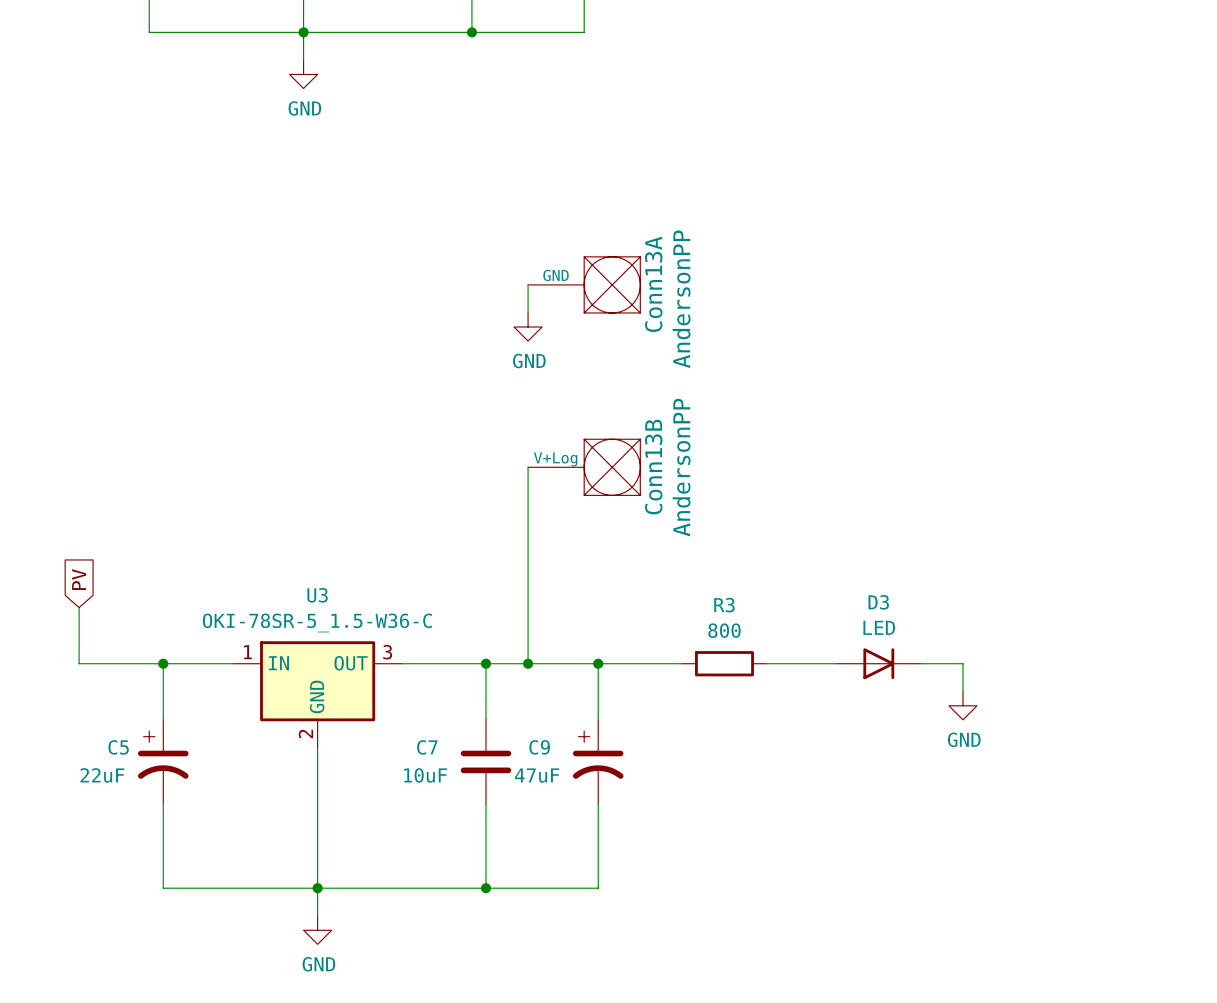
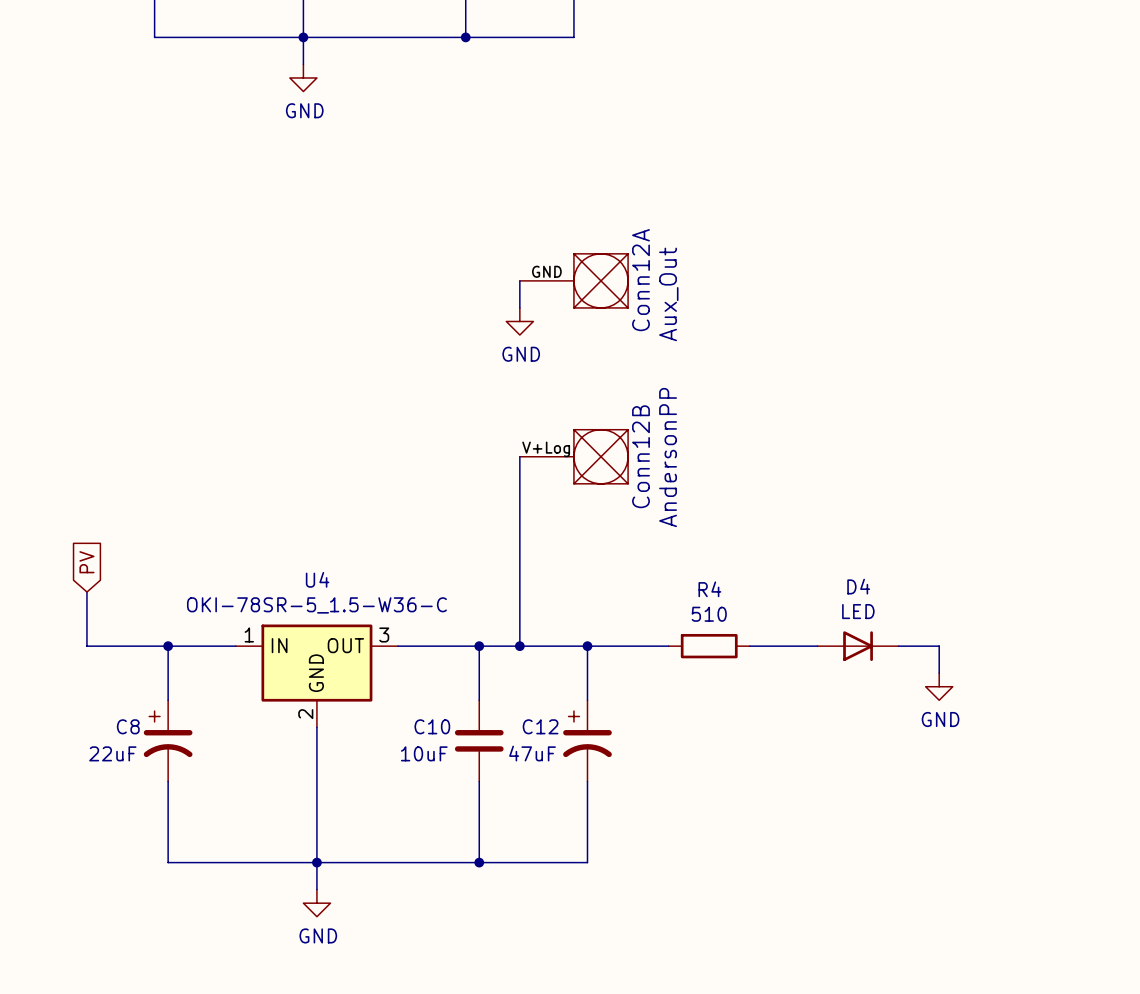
Conn13A name: Conn13A (653, 284) -> Conn12A (640, 280)
Conn13A value: AndersonPP (681, 299) -> Aux_Out (668, 294)
Conn13B name: Conn13B (653, 467) -> Conn12B (640, 456)
U3 name: U3 (317, 595) -> U4 (317, 579)
D3 name: D3 (878, 602) -> D4 (858, 586)
R3 name: R3 (724, 605) -> R4 (709, 589)
R3 value: 800 (724, 630) -> 510 (709, 614)
C5 name: C5 (118, 747) -> C8 (128, 726)
C7 name: C7 (427, 747) -> C10 (432, 726)
C9 name: C9 (539, 747) -> C12 (540, 726)

